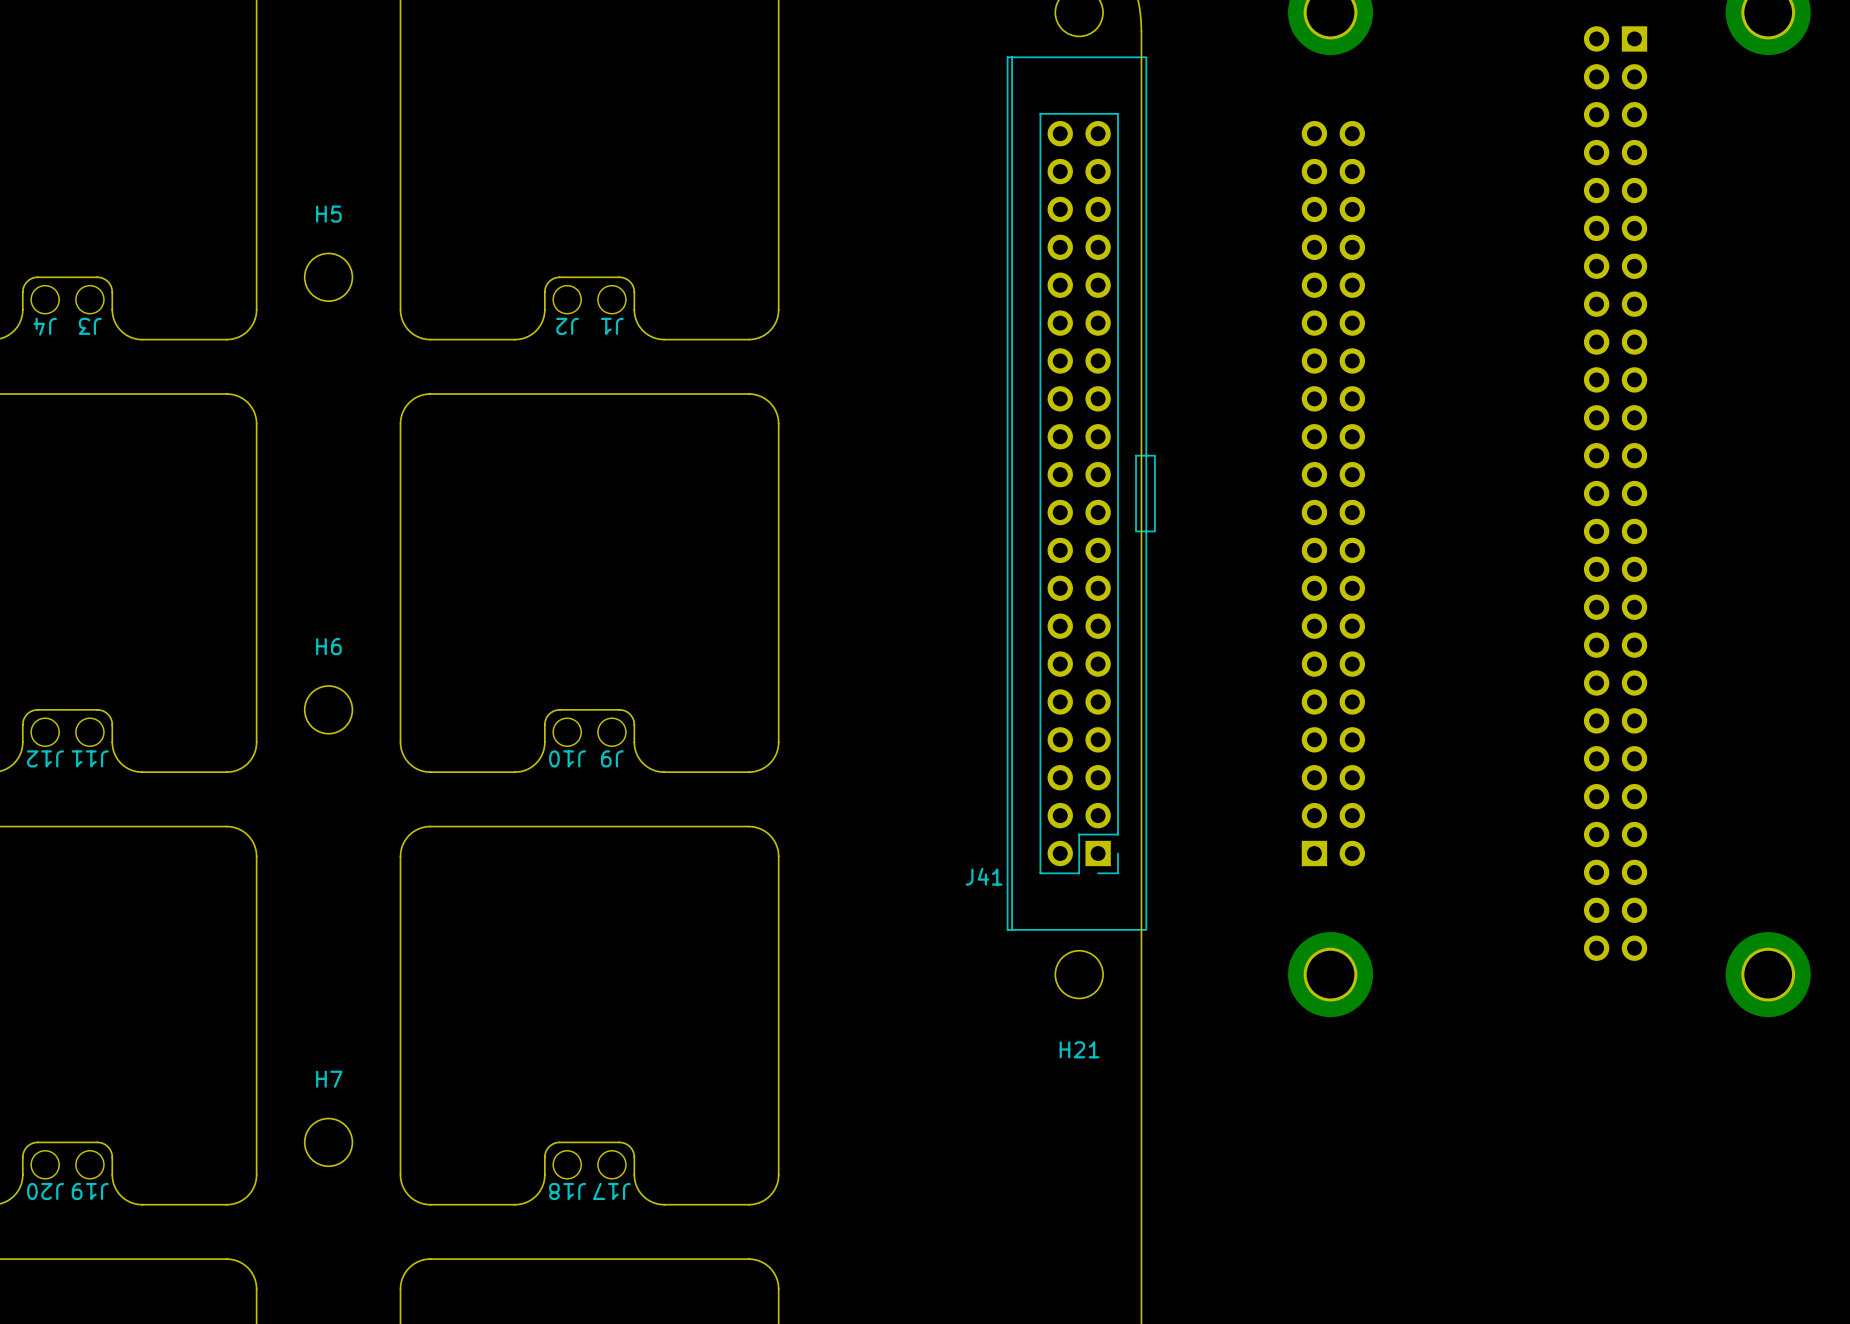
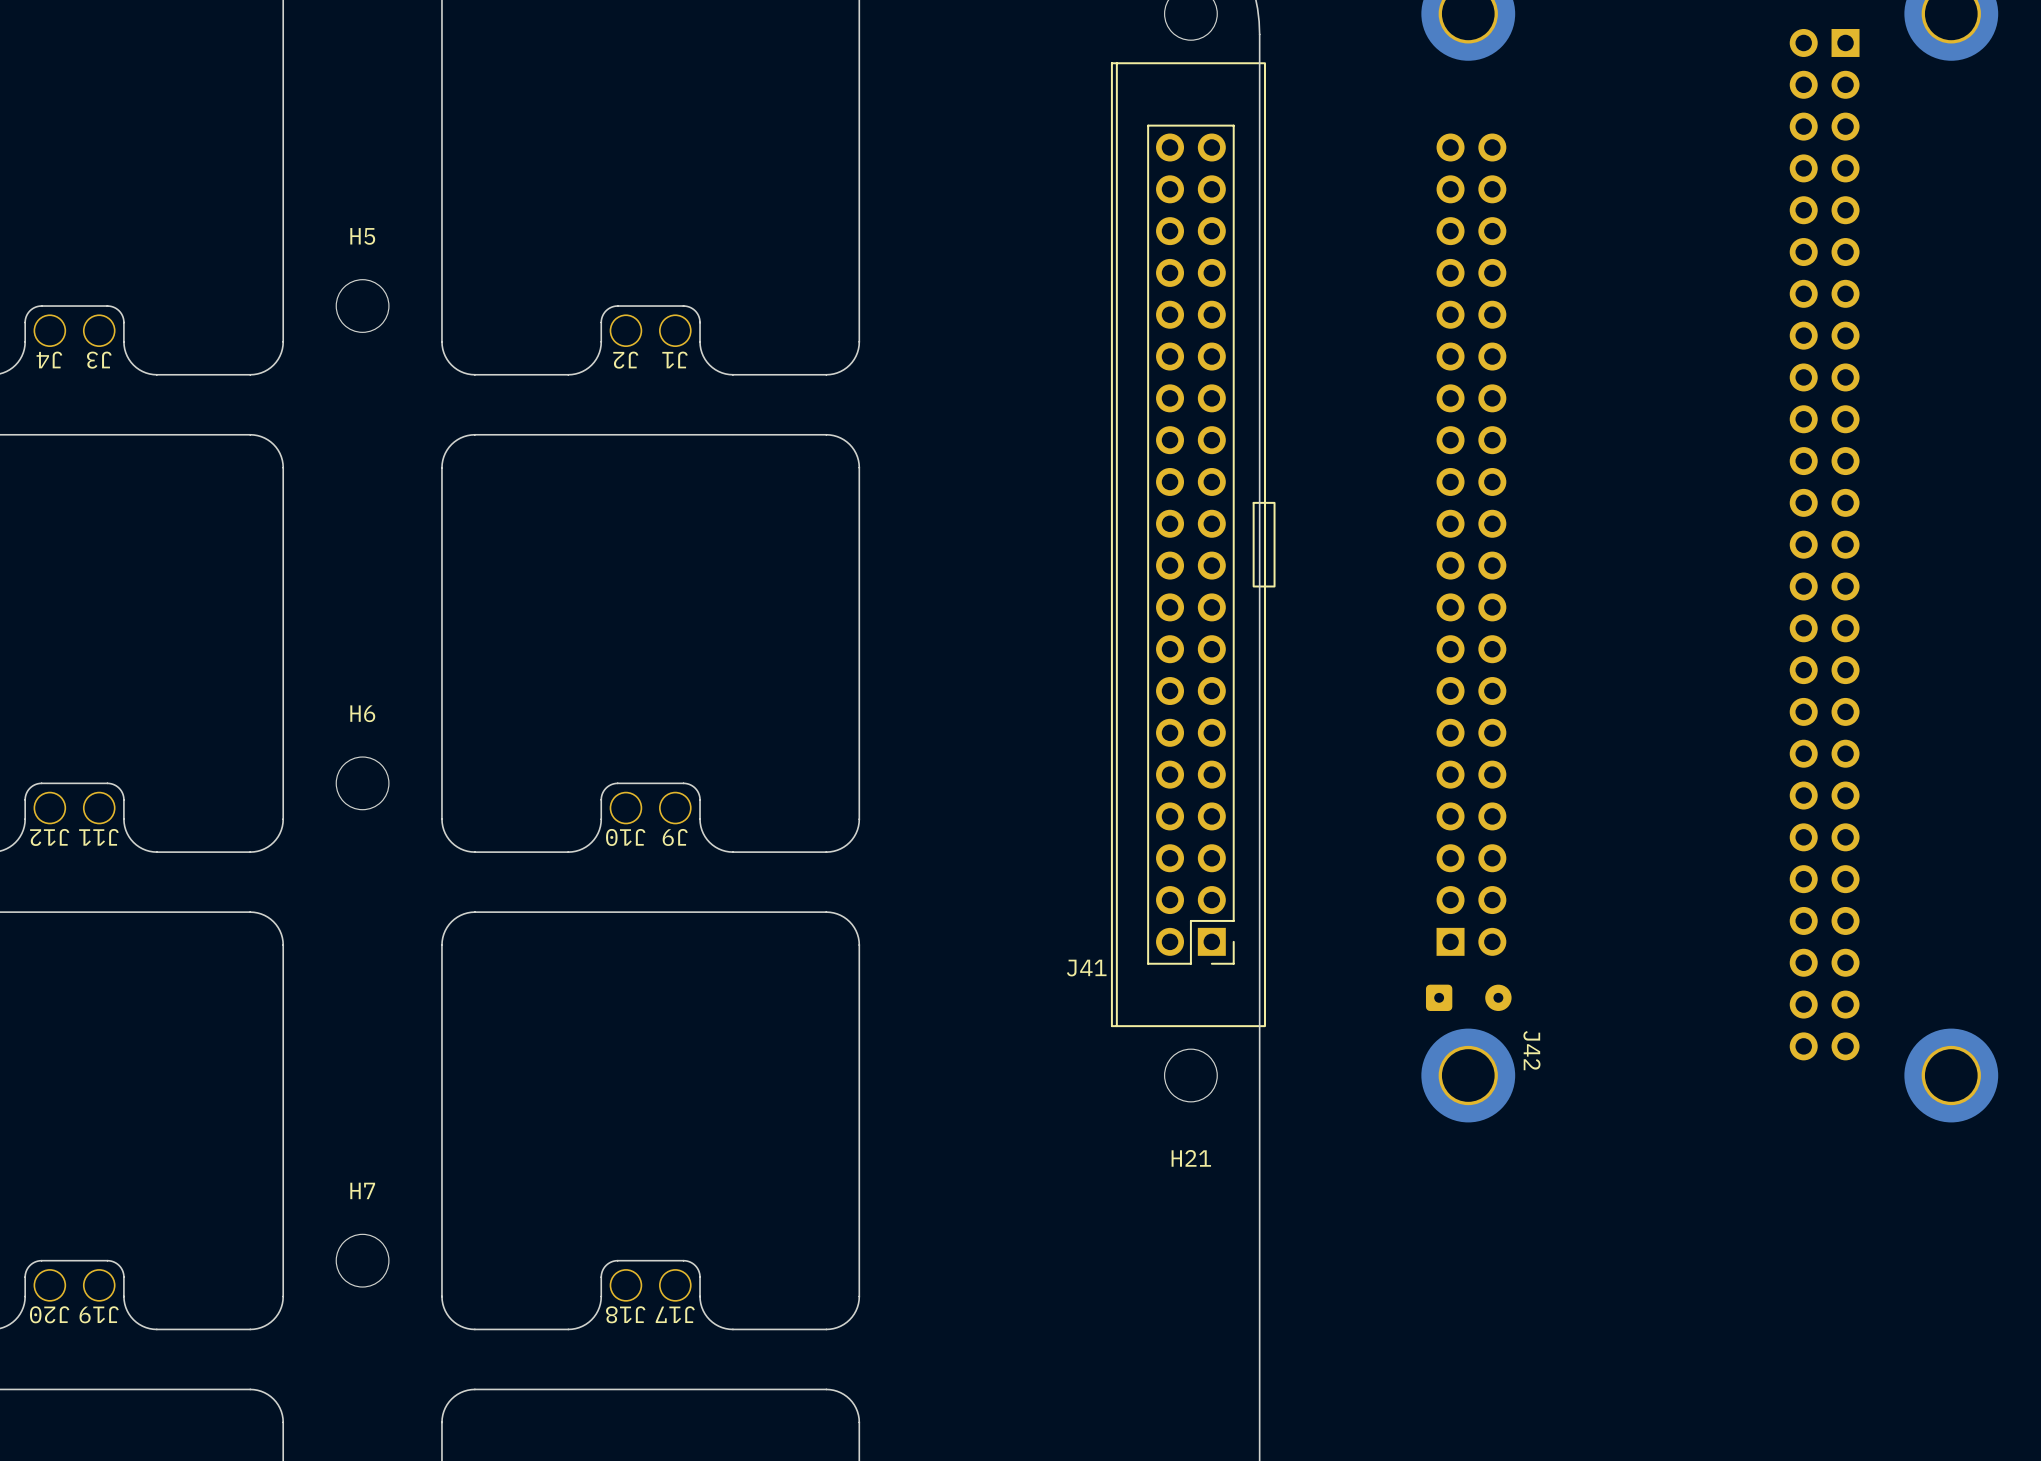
part position: (1615, 493) -> (1824, 544)
J42: none -> (1468, 997)

